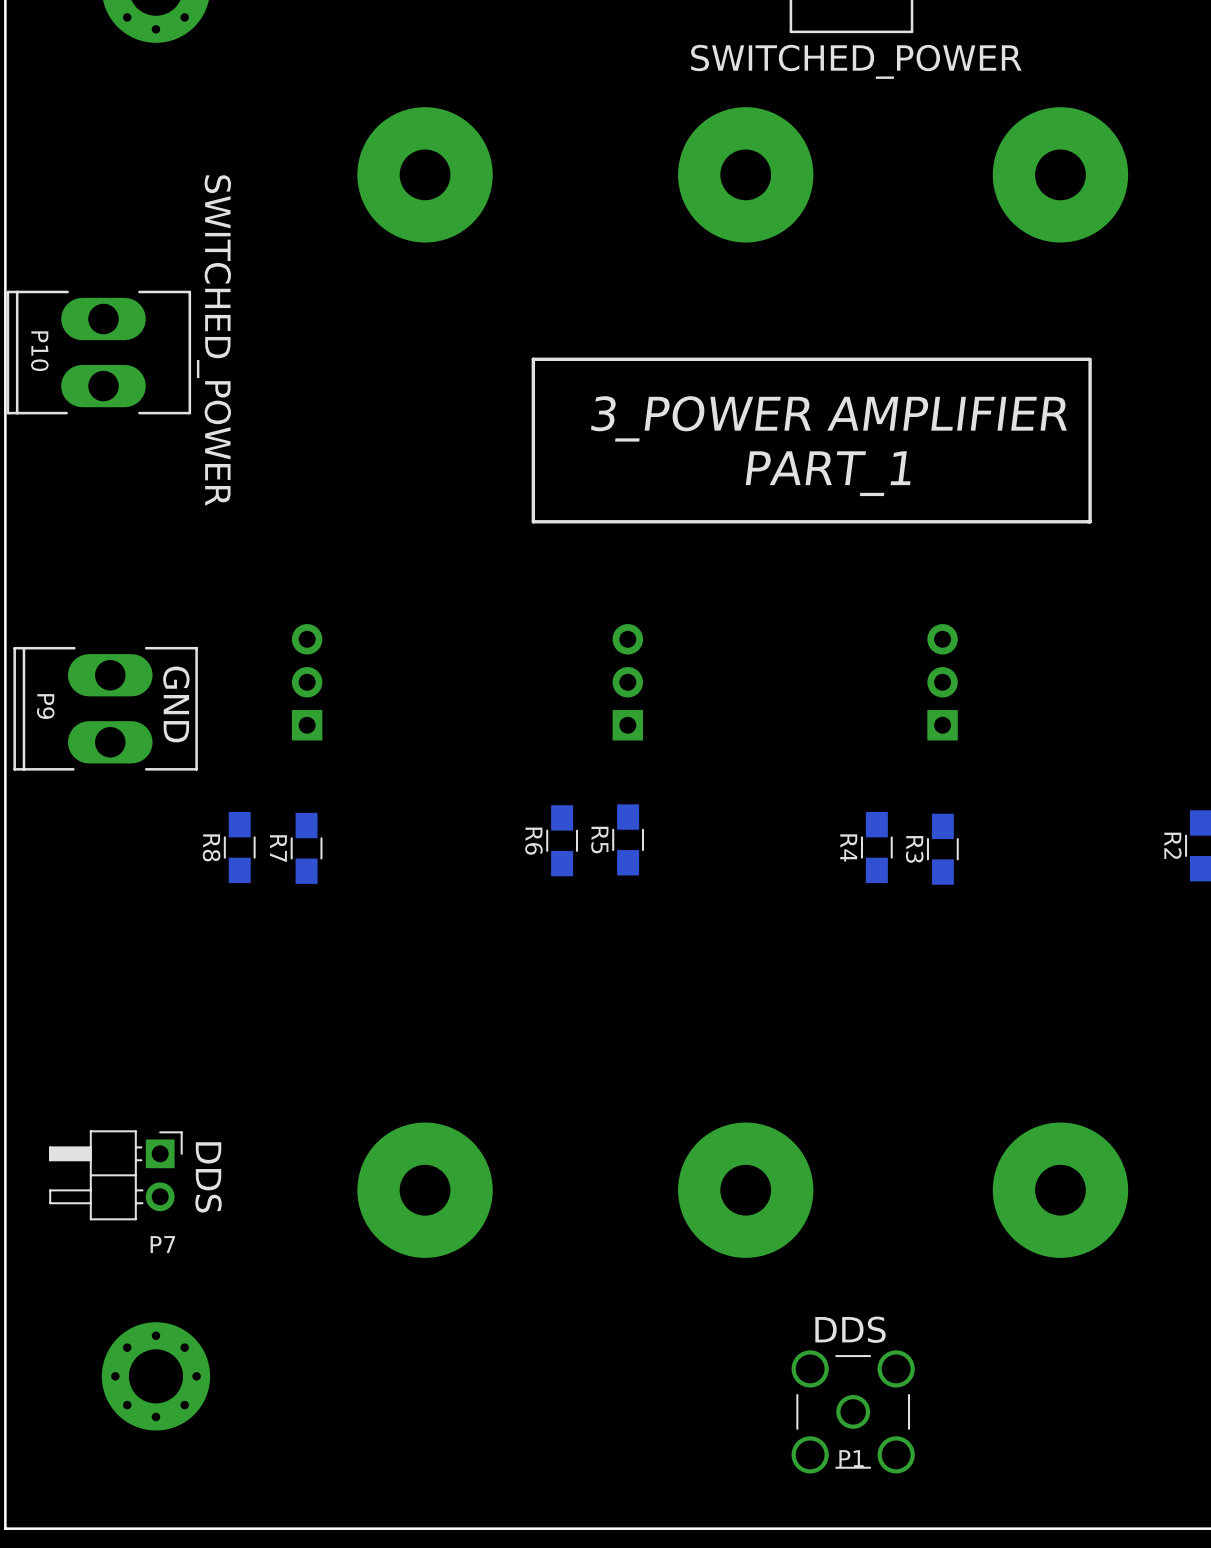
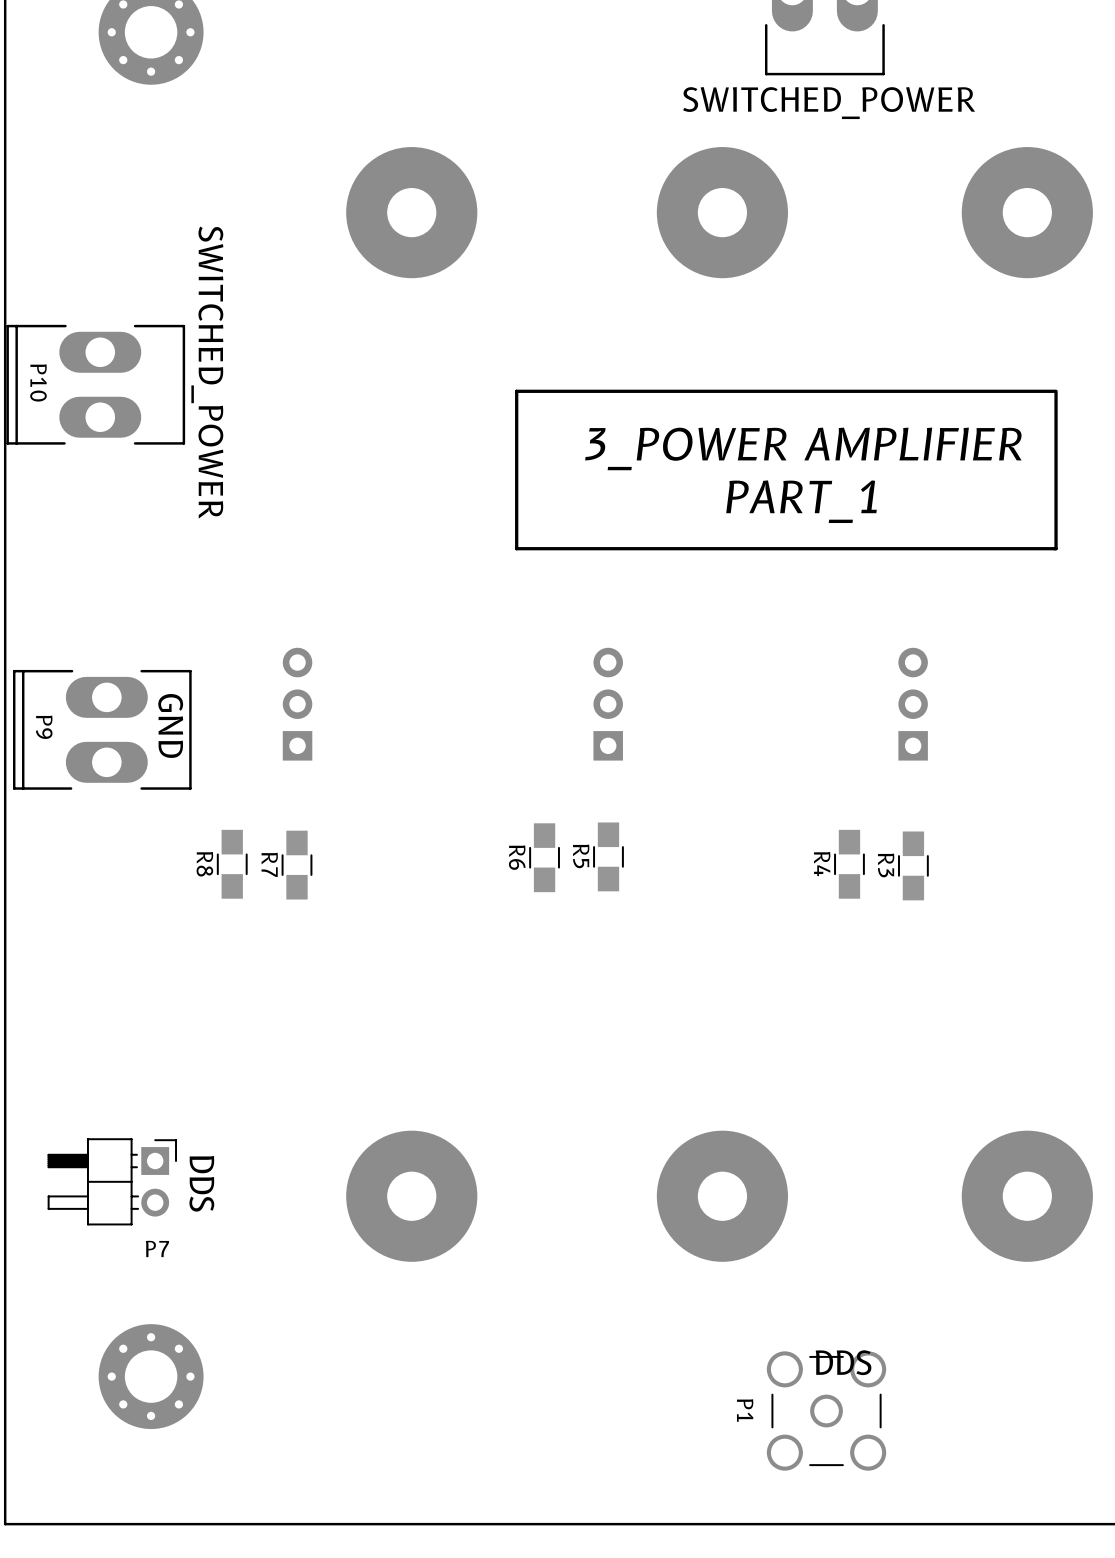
text position: DDS (850, 1329) -> DDS (843, 1362)
P1 name rotation: 0° (851, 1458) -> 90° clockwise (745, 1410)
P1 name position: P1 (851, 1458) -> P1 (745, 1410)

